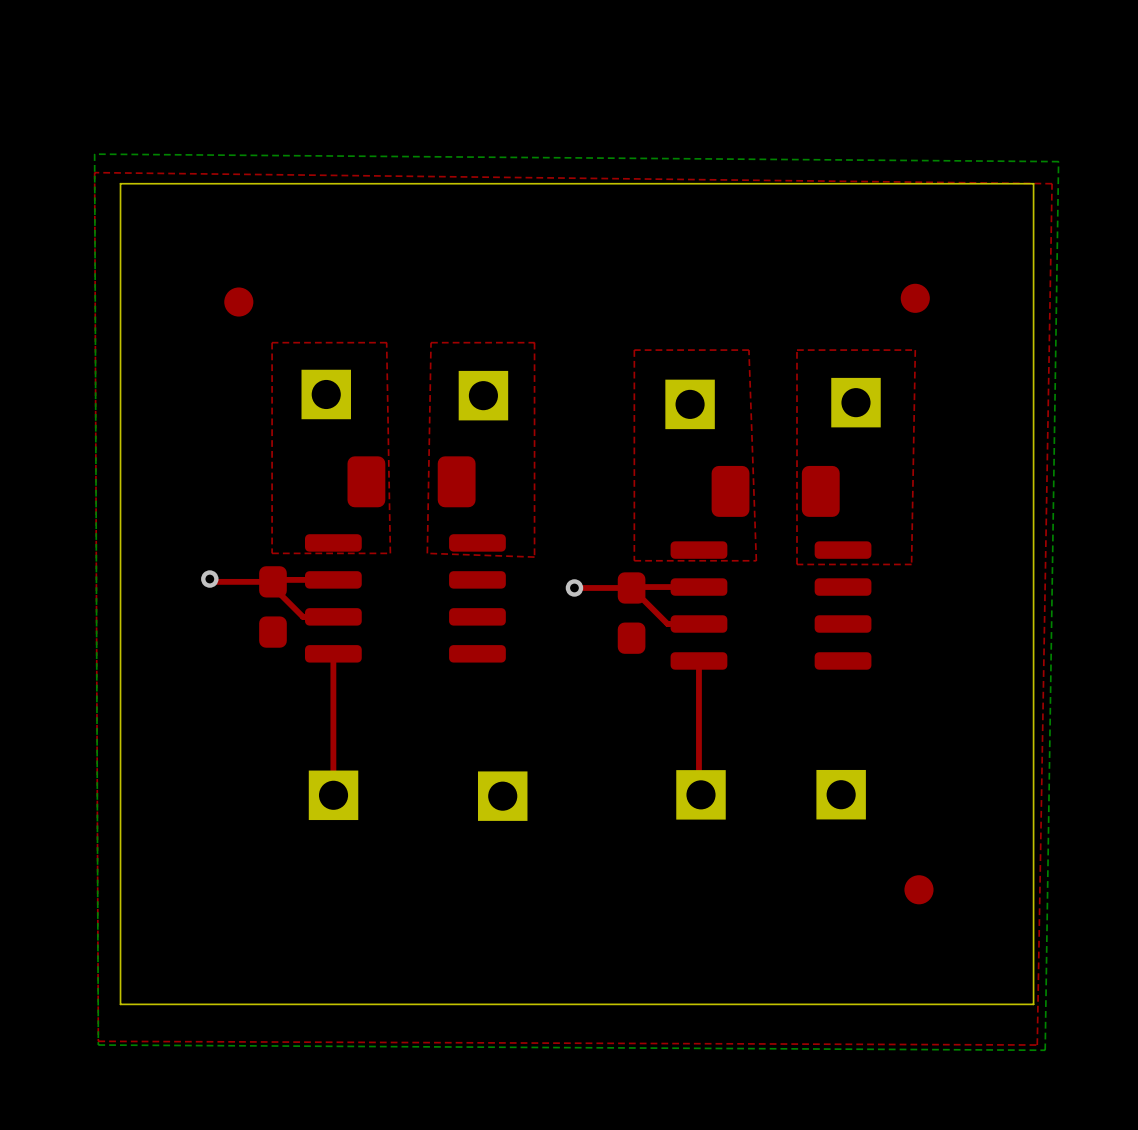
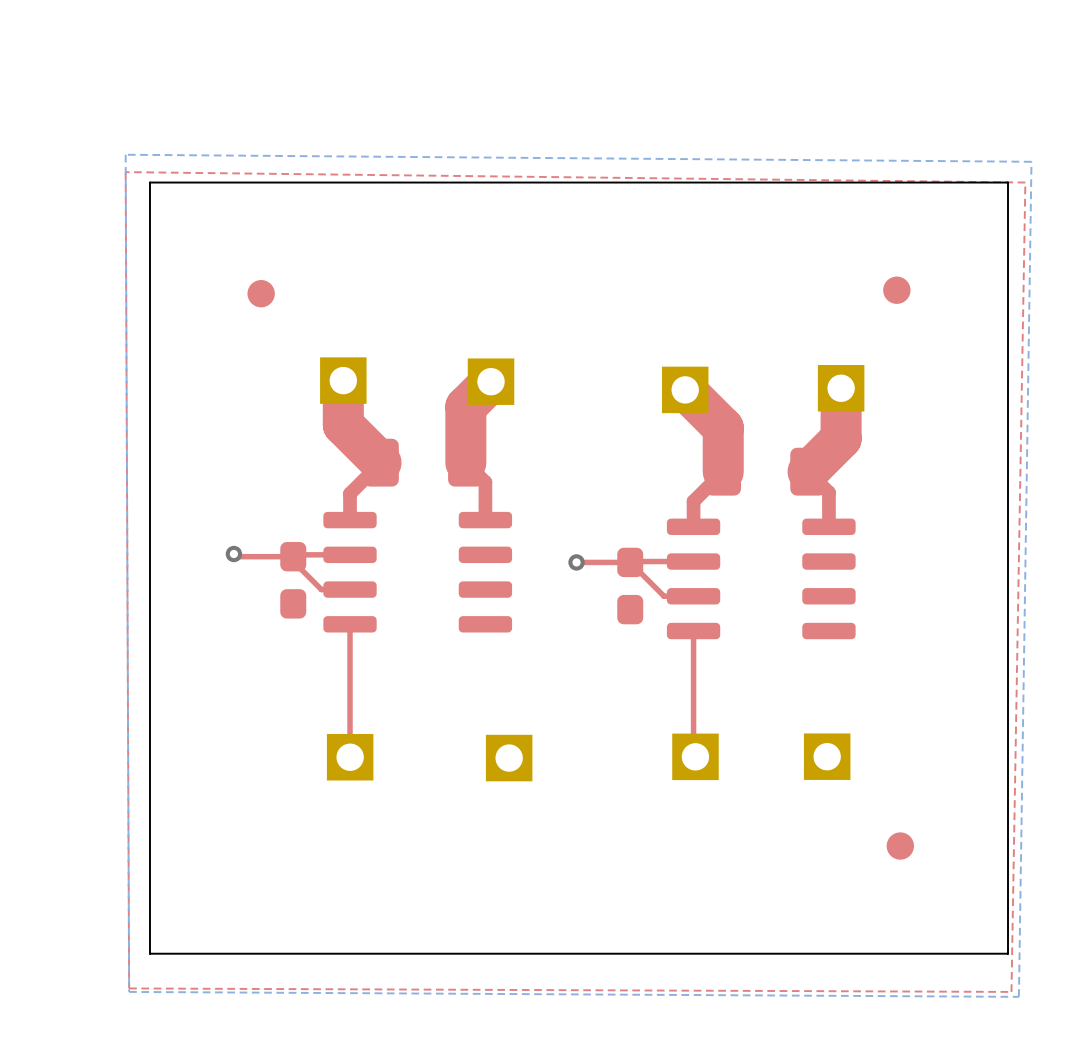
top zone outline: (386, 342) (272, 342) (272, 553) (390, 553) (386, 342) -> none
top zone outline: (534, 342) (534, 557) (427, 553) (431, 342) (534, 342) -> none
top zone outline: (748, 350) (634, 350) (634, 560) (756, 560) (748, 350) -> none
top zone outline: (915, 350) (796, 350) (796, 564) (911, 564) (915, 350) -> none
top track: none -> (343, 380) (343, 424) (381, 462) (350, 493) (350, 520)
top track: none -> (491, 381) (465, 406) (465, 462) (485, 482) (485, 520)
top track: none -> (841, 388) (841, 438) (808, 471) (828, 492) (828, 526)
top track: none -> (685, 389) (723, 427) (723, 471) (693, 501) (693, 526)

